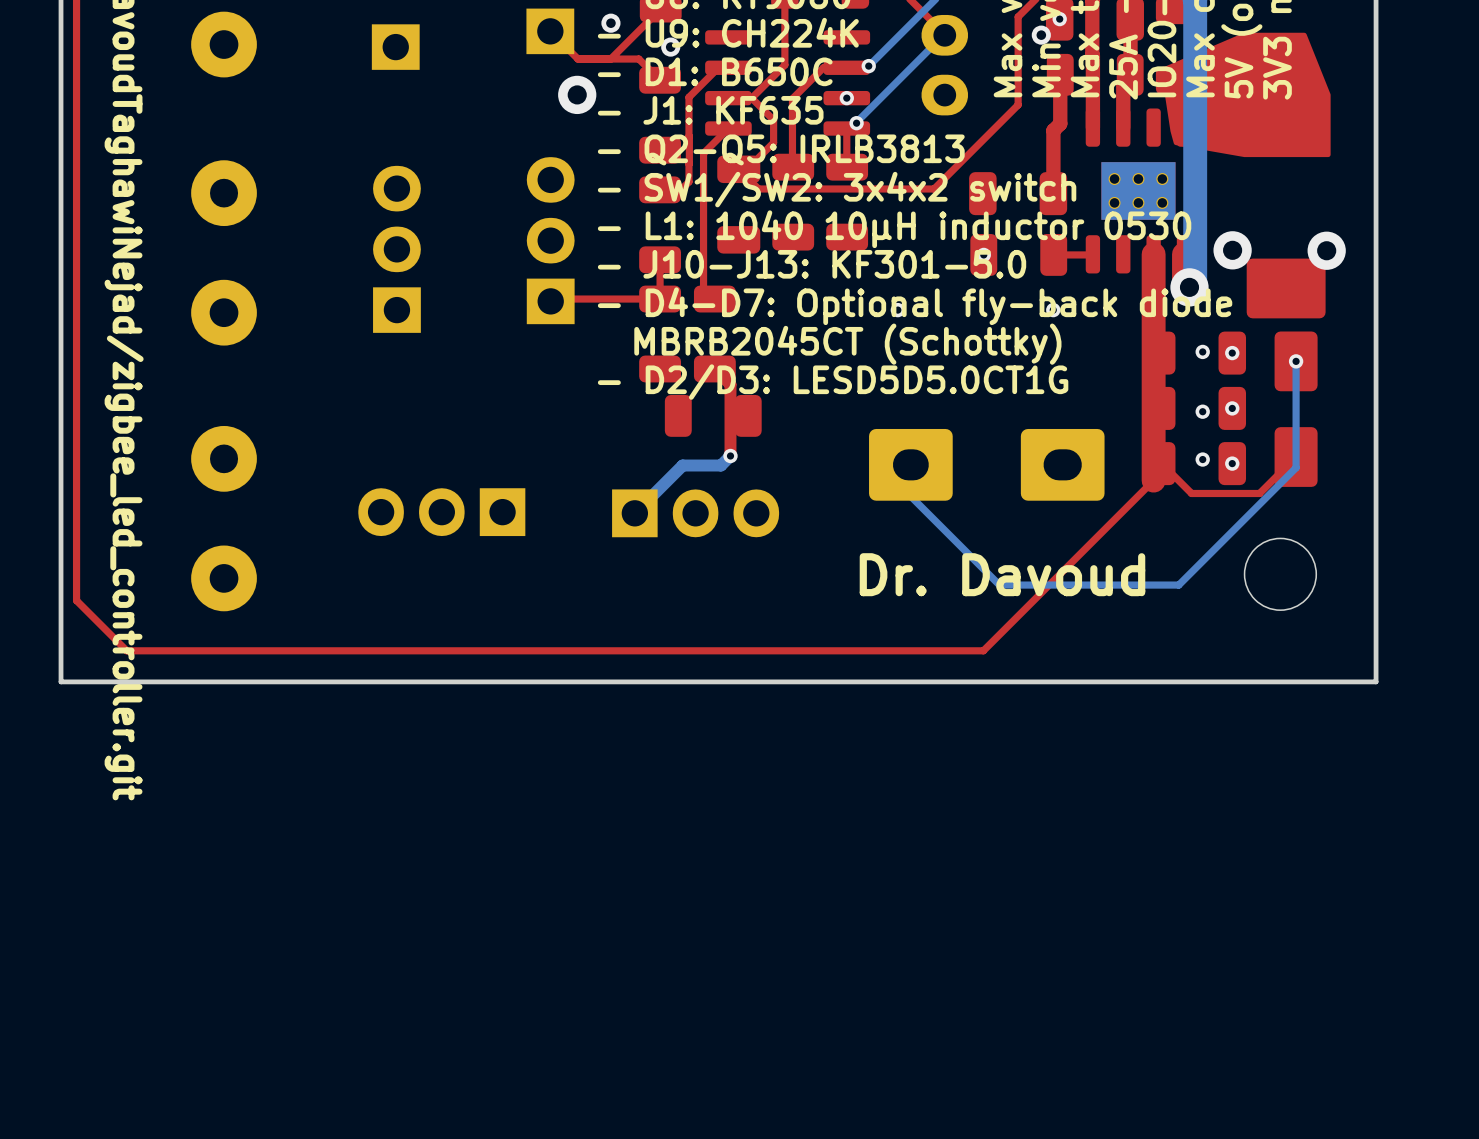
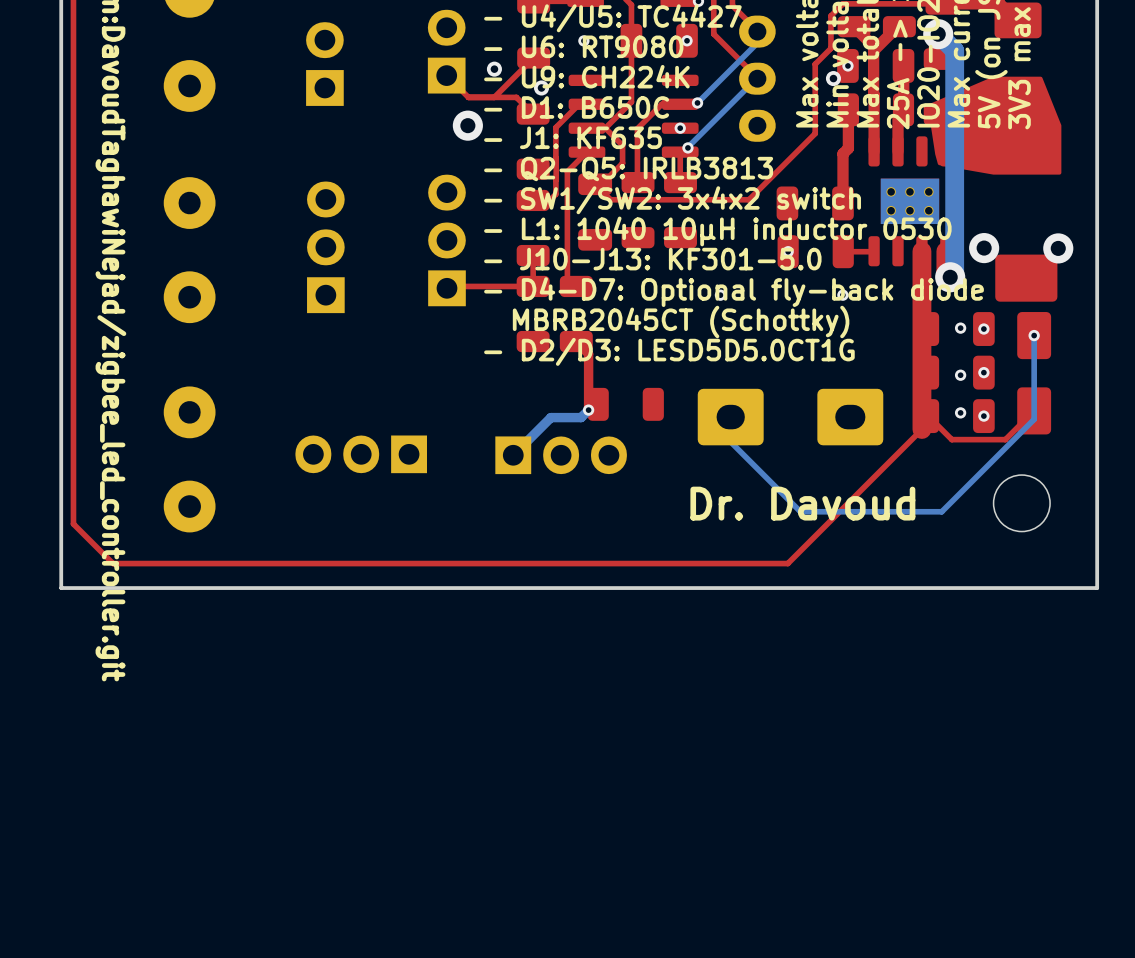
part position: (713, 415) -> (625, 404)

